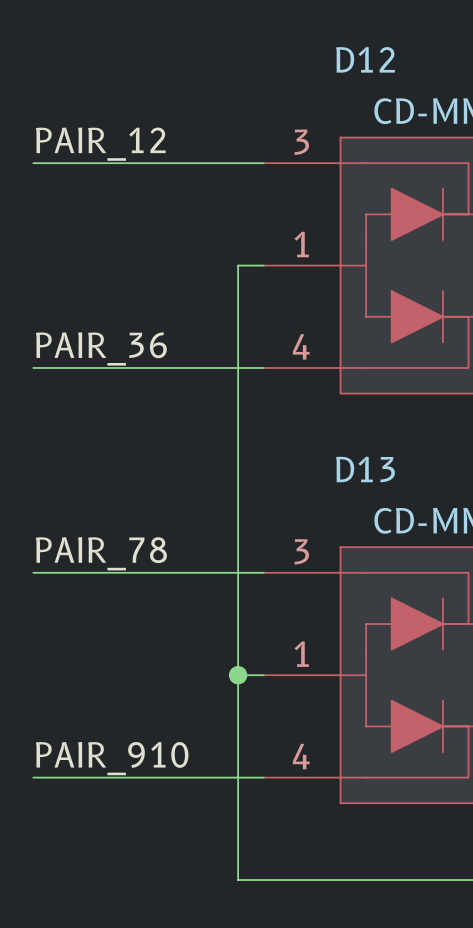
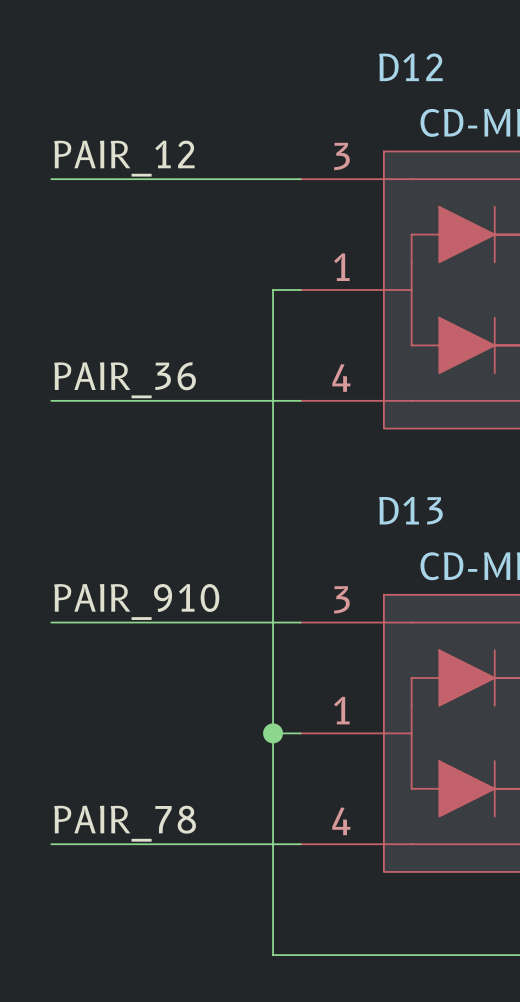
label: PAIR_78 (101, 553) -> PAIR_910 (136, 601)
label: PAIR_910 (112, 758) -> PAIR_78 (125, 823)

